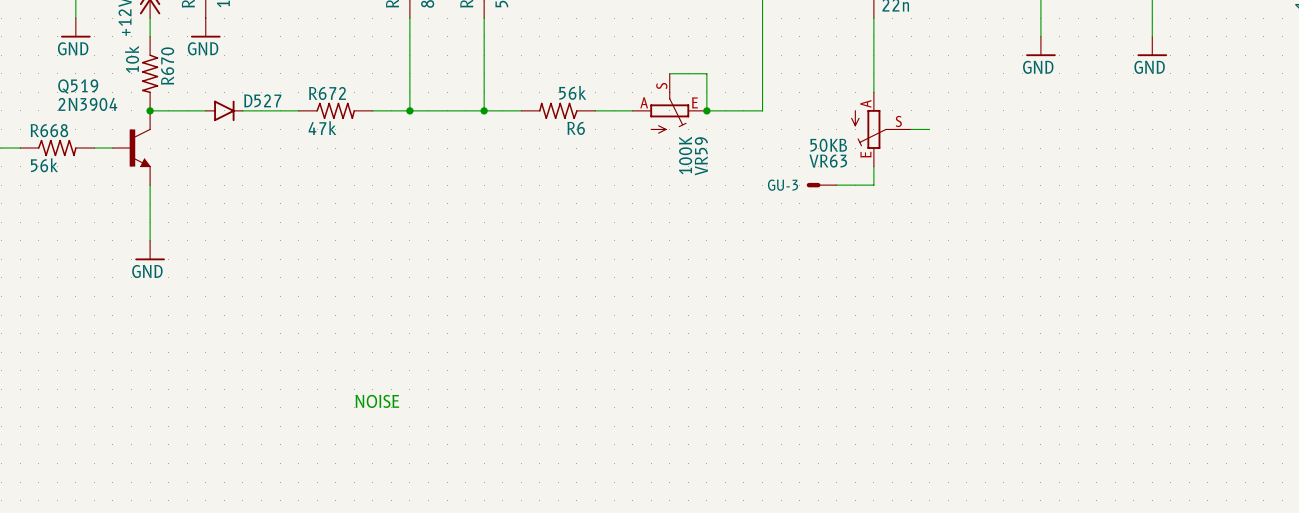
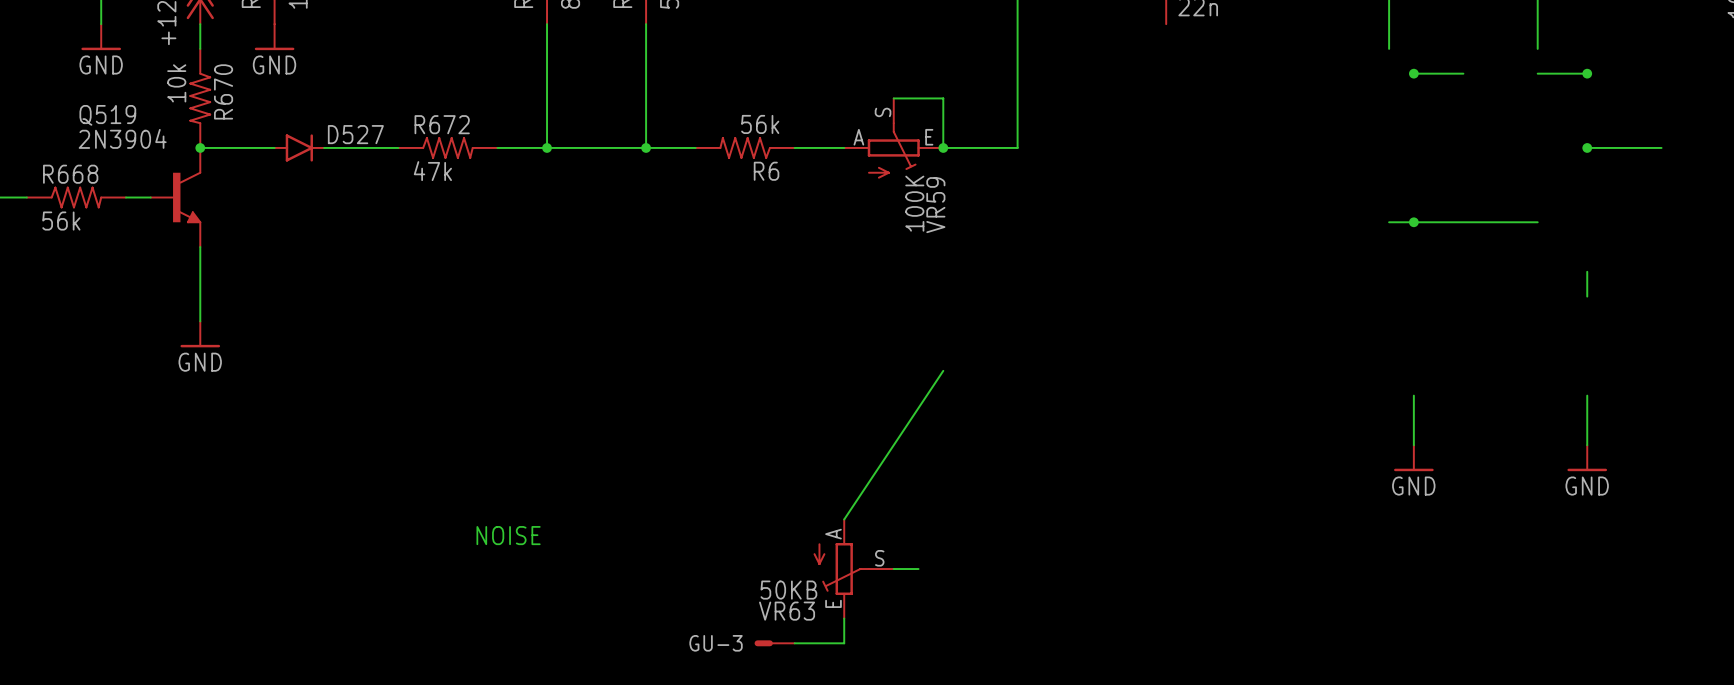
wire: (873, 18) (873, 92) -> none
power symbol: GND (1040, 46) -> none
power symbol: GND (1152, 46) -> none
wire: none -> (1413, 73) (1463, 73)
junction: none -> (1413, 73)
wire: none -> (1537, 73) (1587, 73)
junction: none -> (1587, 73)
wire: none -> (1587, 147) (1661, 147)
junction: none -> (1587, 147)
VR63 position: (881, 129) -> (853, 569)
wire: (911, 129) (929, 129) -> none
wire: (873, 166) (873, 185) (836, 185) -> none
wire: none -> (1389, 222) (1537, 222)
junction: none -> (1413, 222)
GU-3 position: (821, 185) -> (774, 643)
wire: none -> (1587, 271) (1587, 296)
wire: none -> (943, 370) (844, 519)
wire: none -> (1413, 395) (1413, 445)
wire: none -> (1587, 395) (1587, 445)
power symbol: none -> GND (1413, 458)
power symbol: none -> GND (1587, 458)
wire: none -> (893, 569) (918, 569)
wire: none -> (844, 618) (844, 643) (794, 643)

